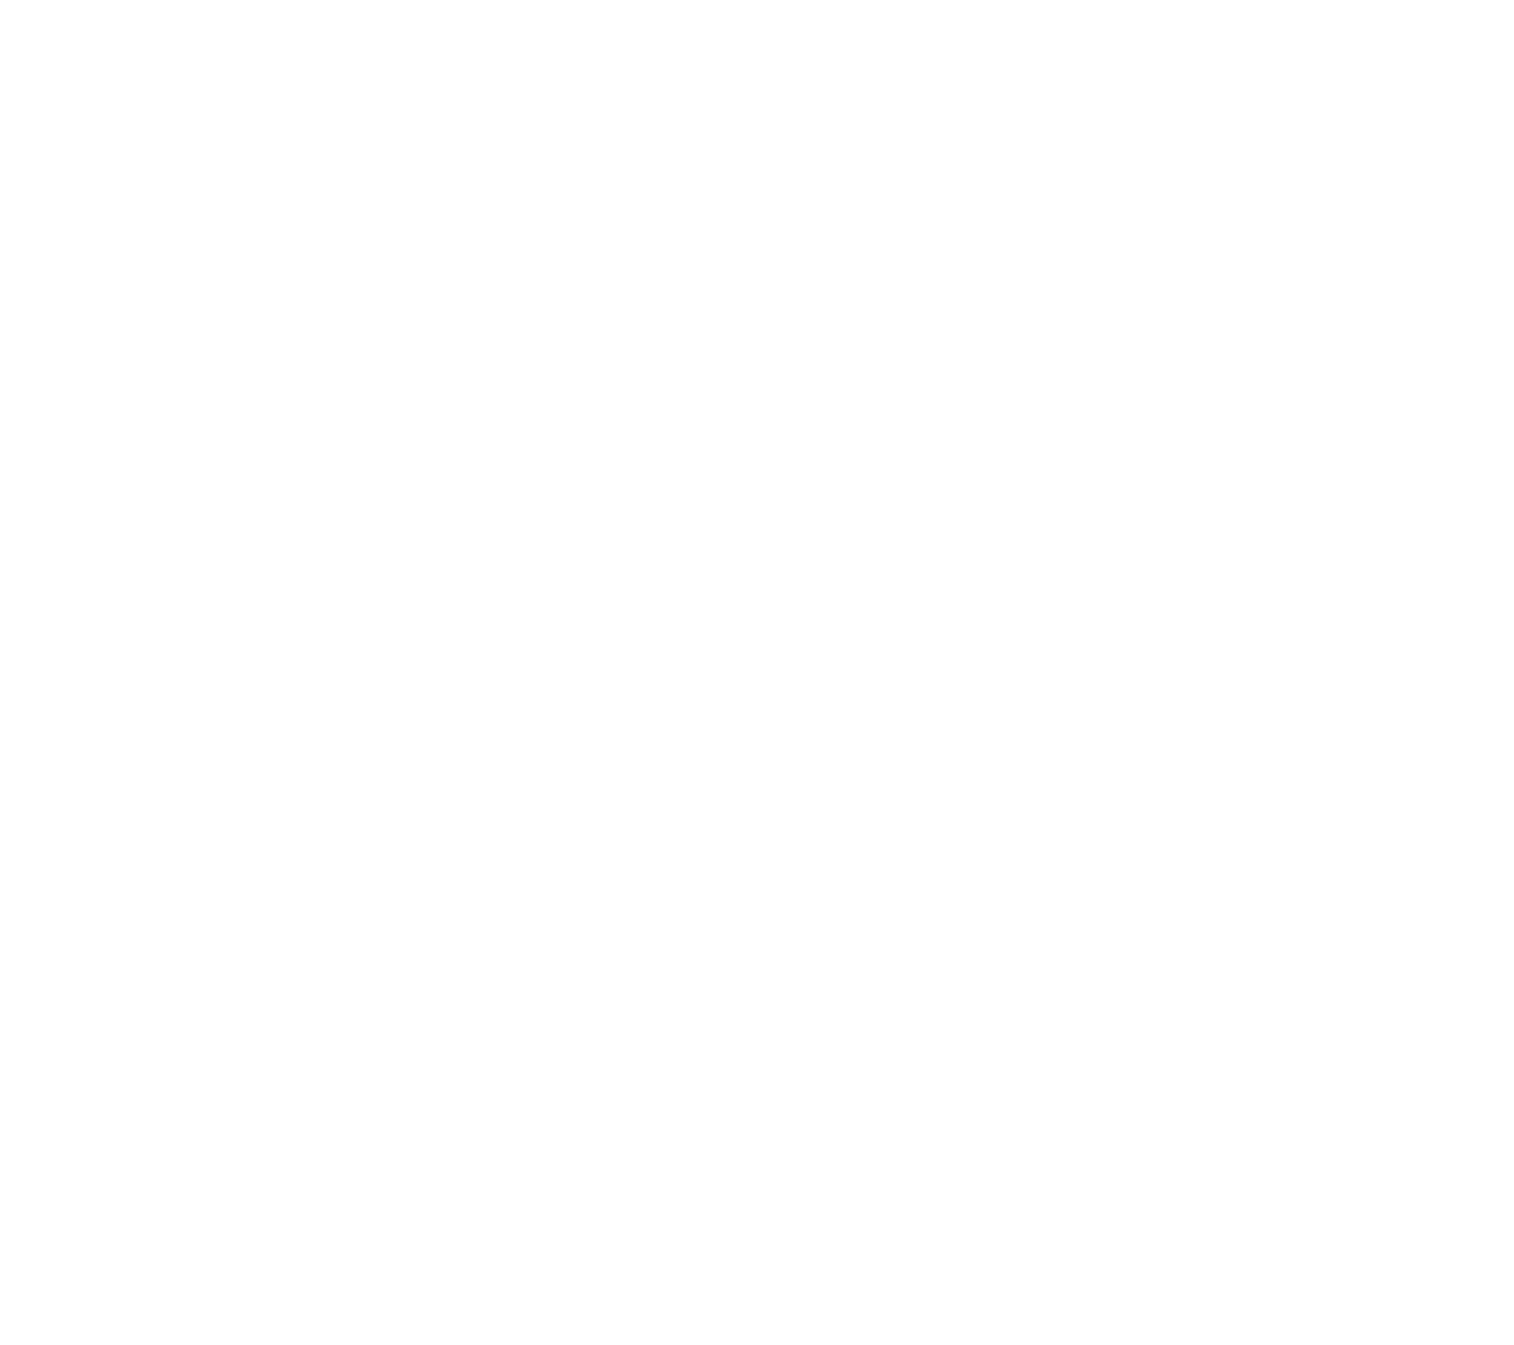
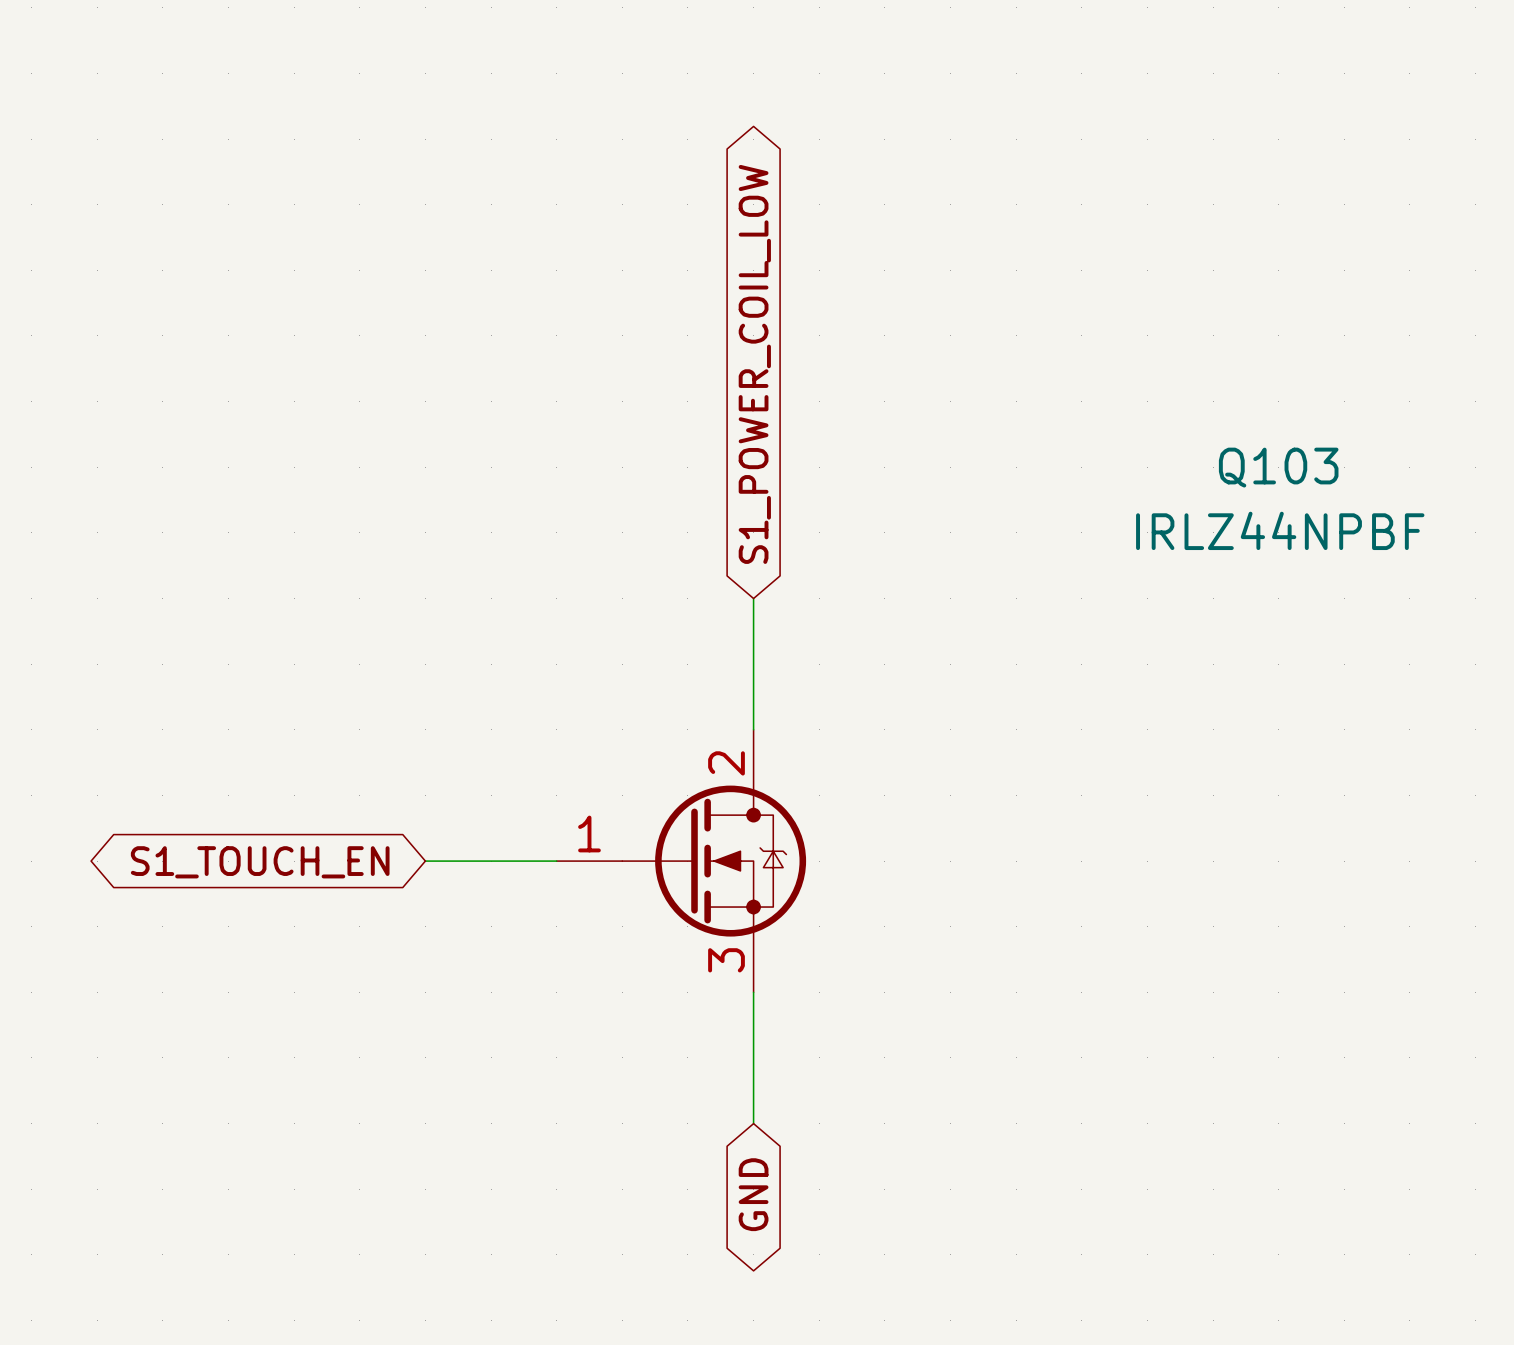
global label: none -> S1_POWER_COIL_LOW (754, 364)
wire: none -> (753, 598) (753, 729)
wire: none -> (425, 861) (556, 861)
Q103: none -> IRLZ44NPBF (681, 861)
global label: none -> S1_TOUCH_EN (260, 862)
wire: none -> (753, 992) (753, 1123)
global label: none -> GND (753, 1194)

